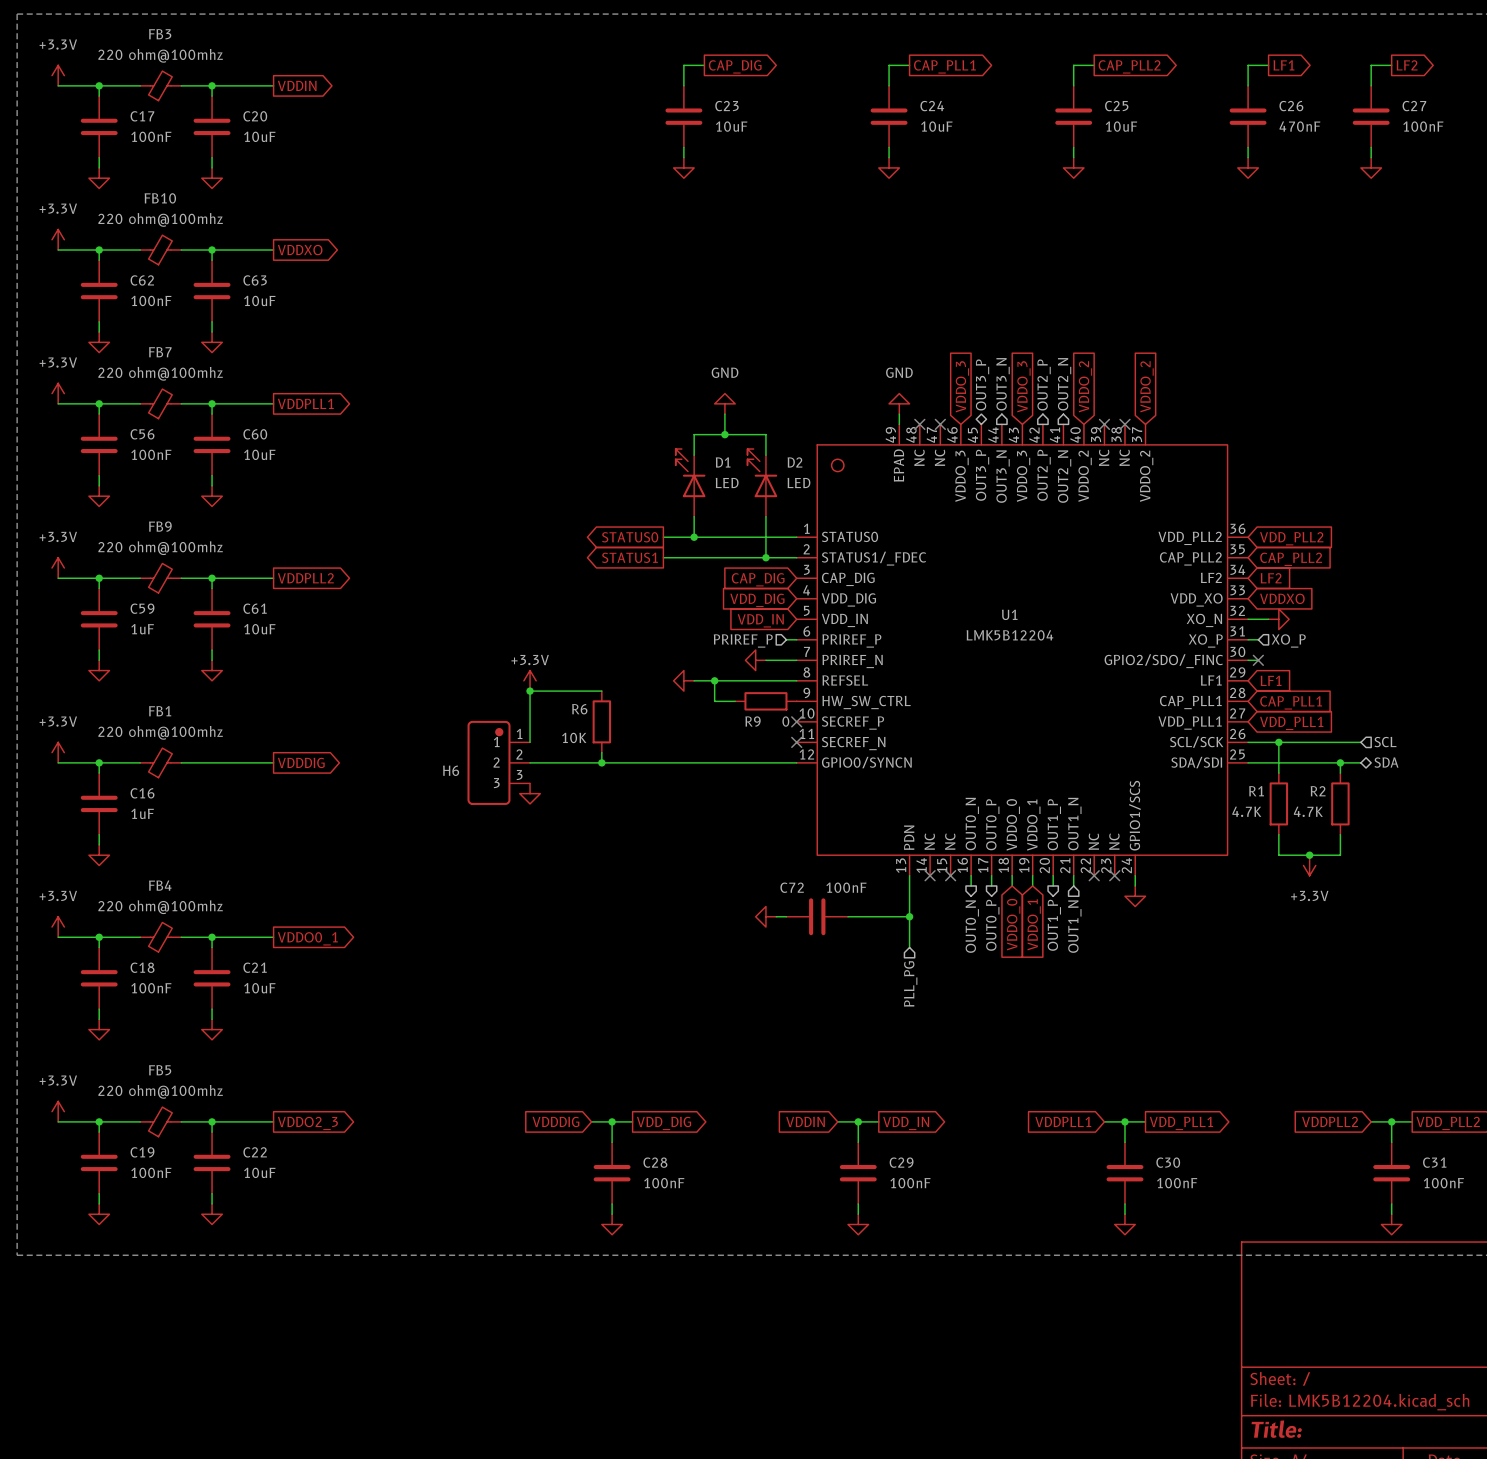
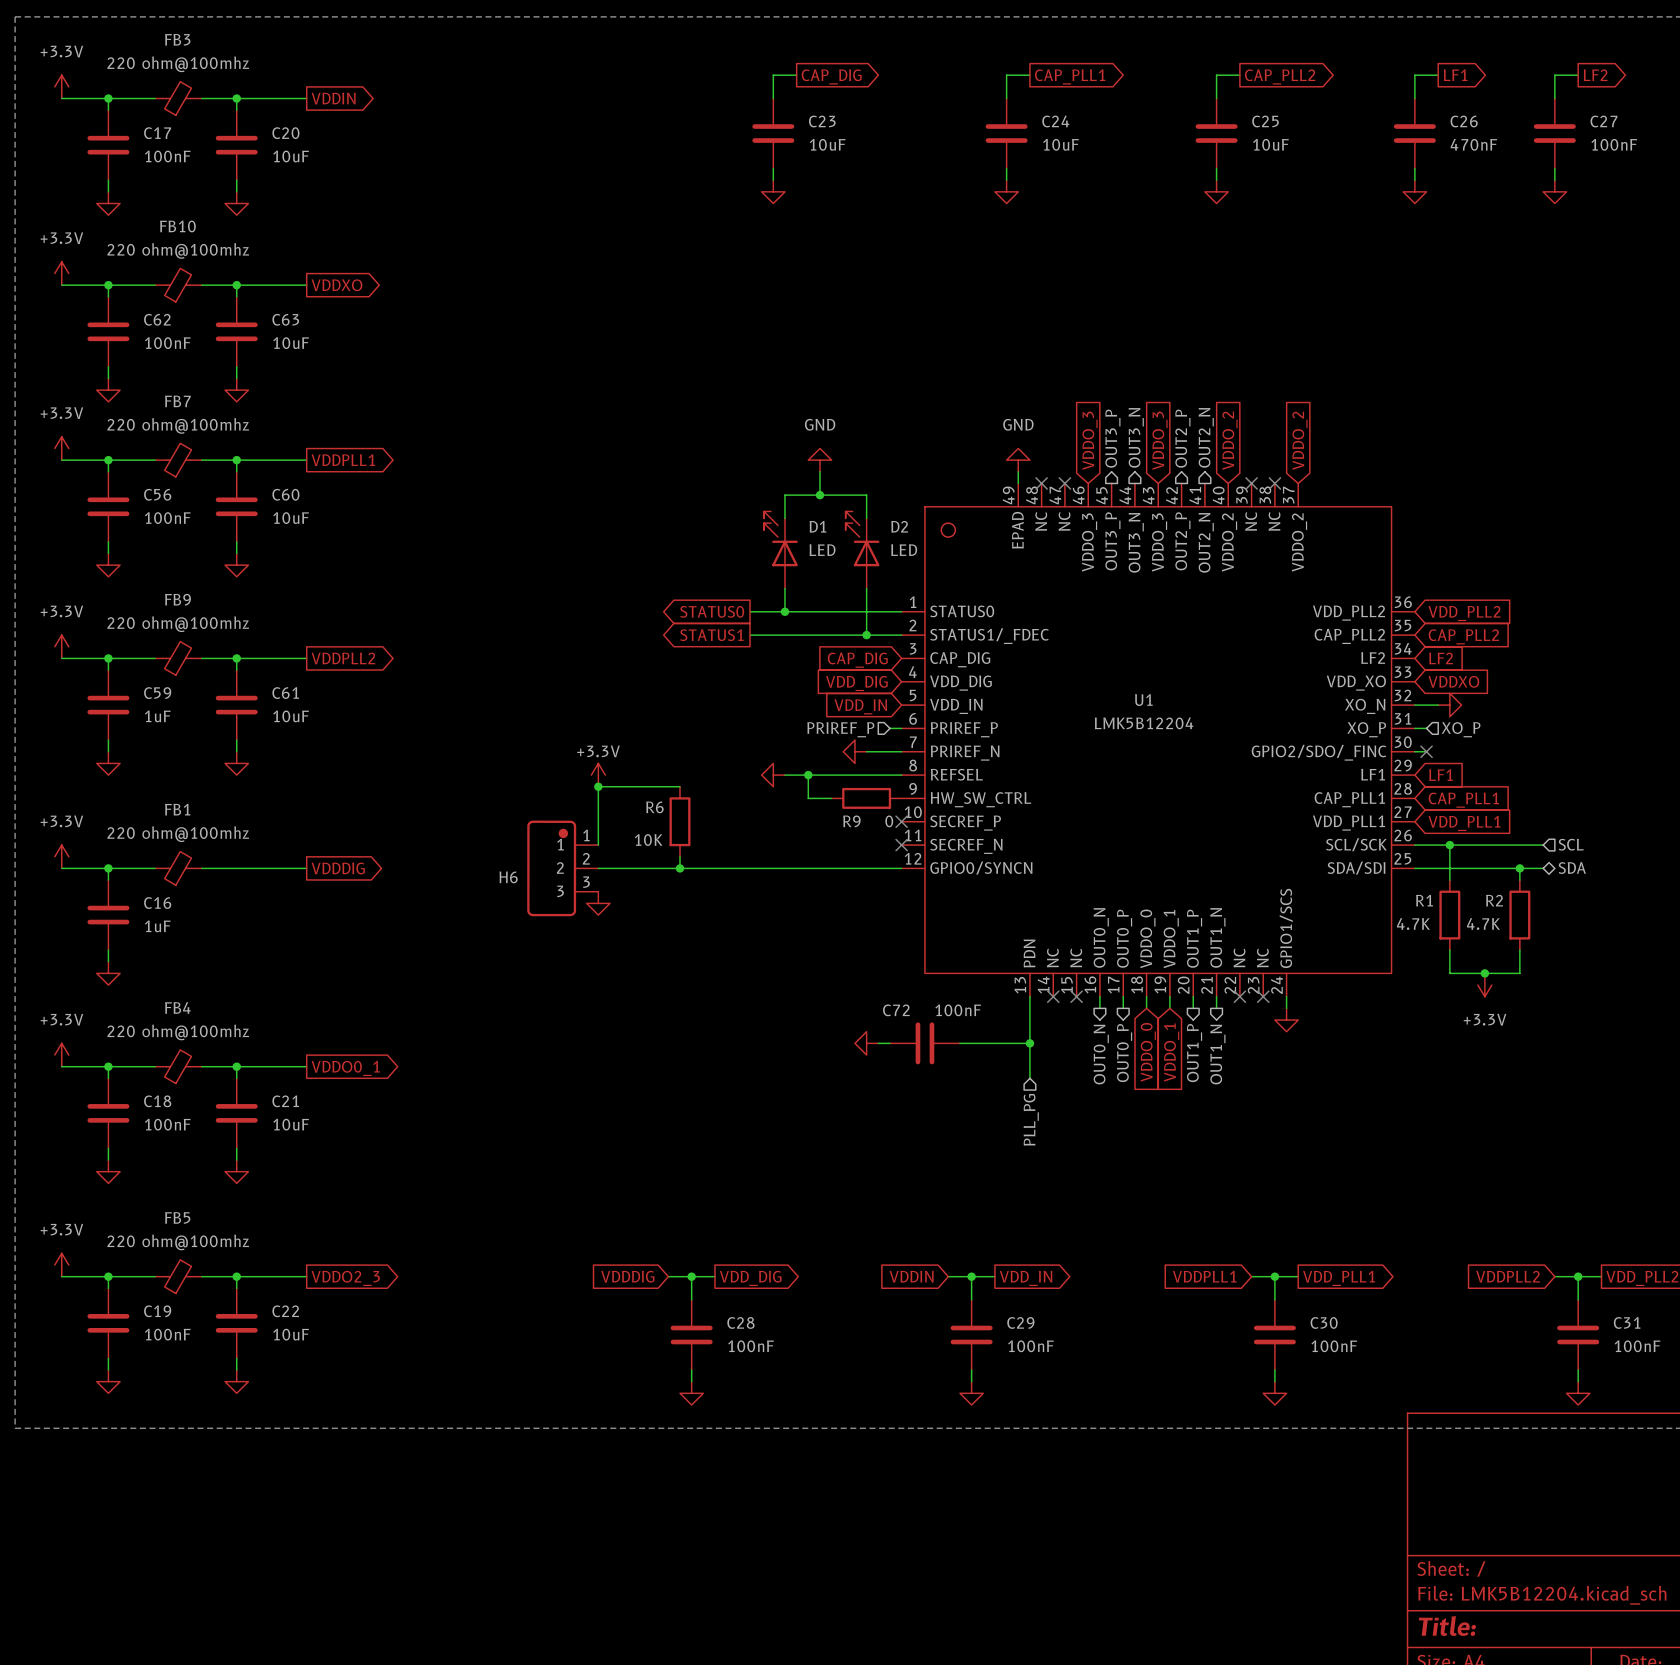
hierarchical label shape: bidirectional (982, 384) -> output (1112, 438)
hierarchical label shape: input (1074, 926) -> output (1217, 1054)

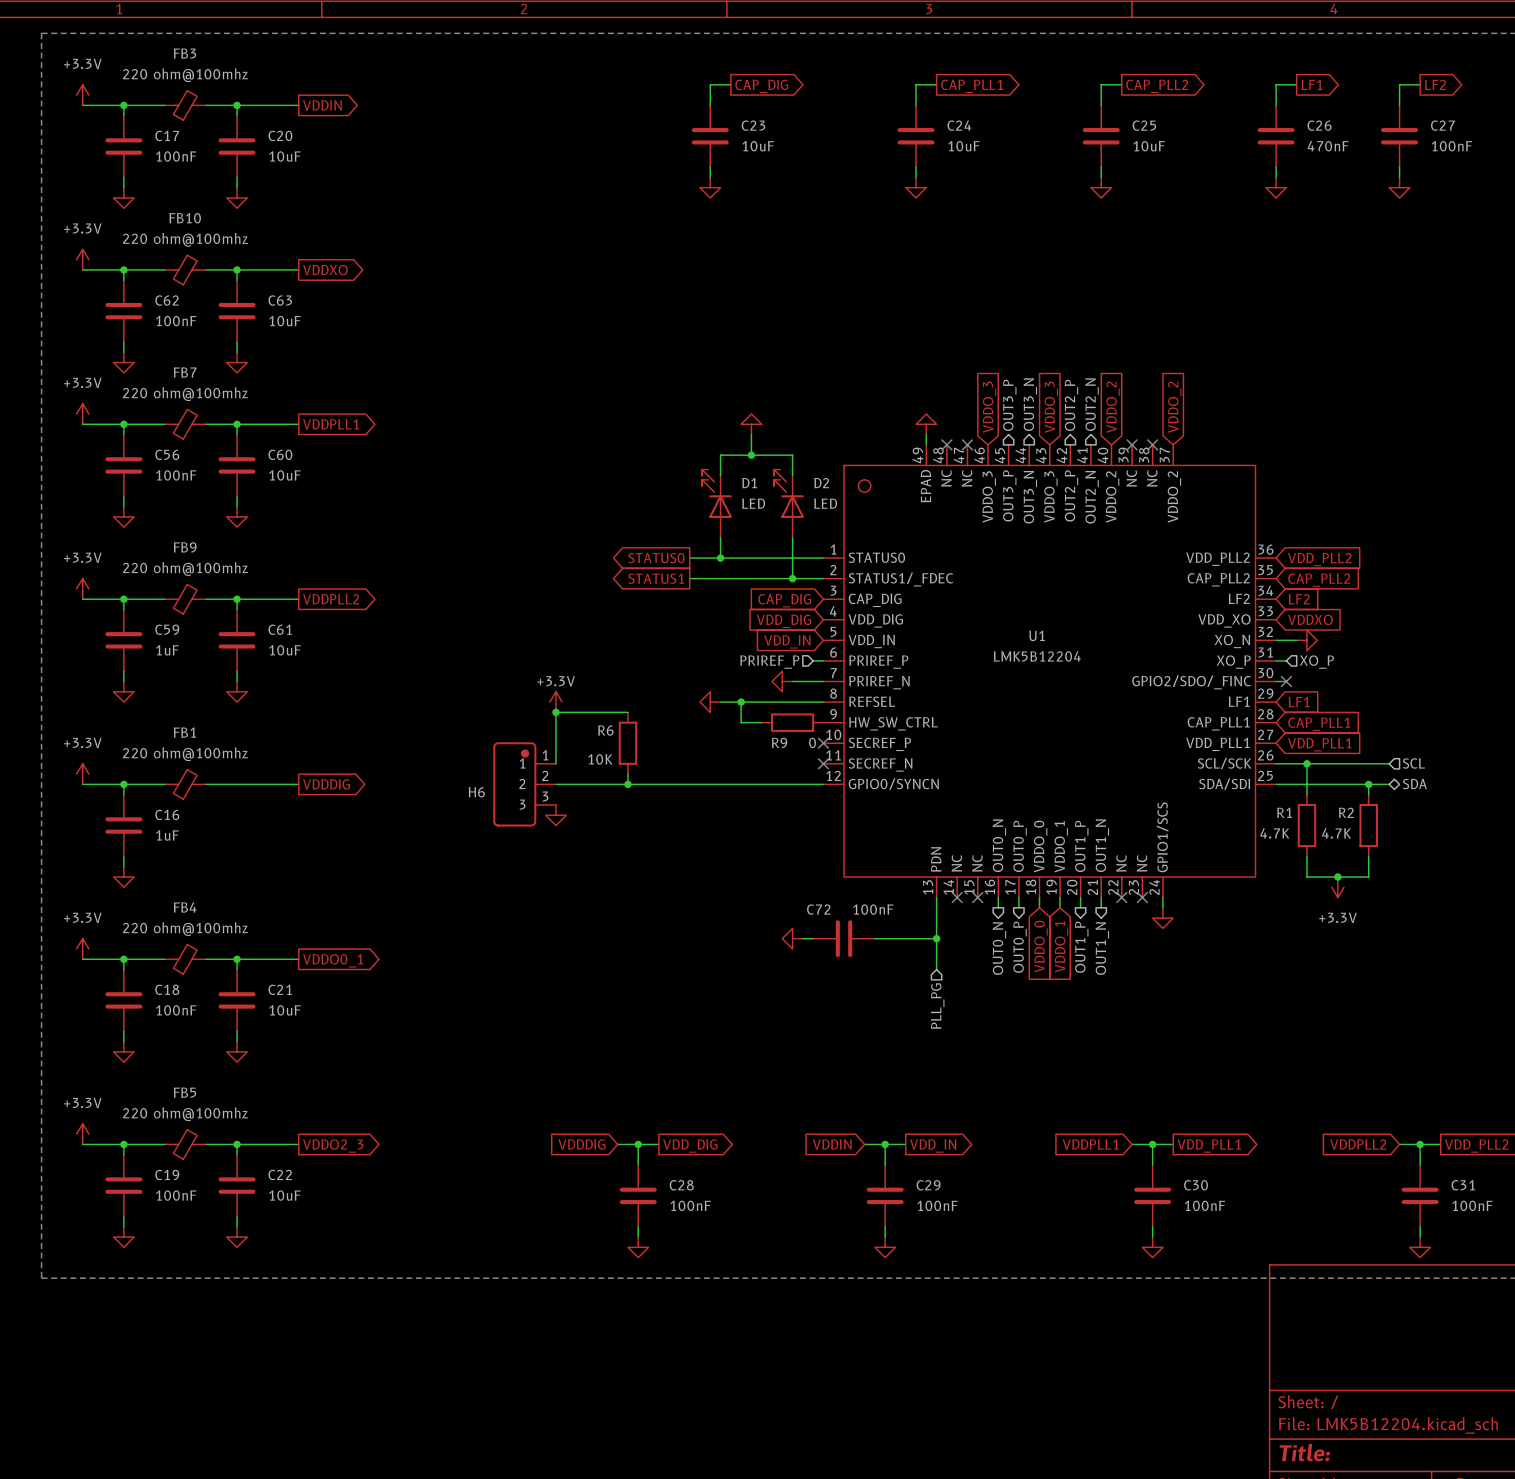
power symbol text: GND (820, 424) -> none
power symbol text: GND (1018, 424) -> none

